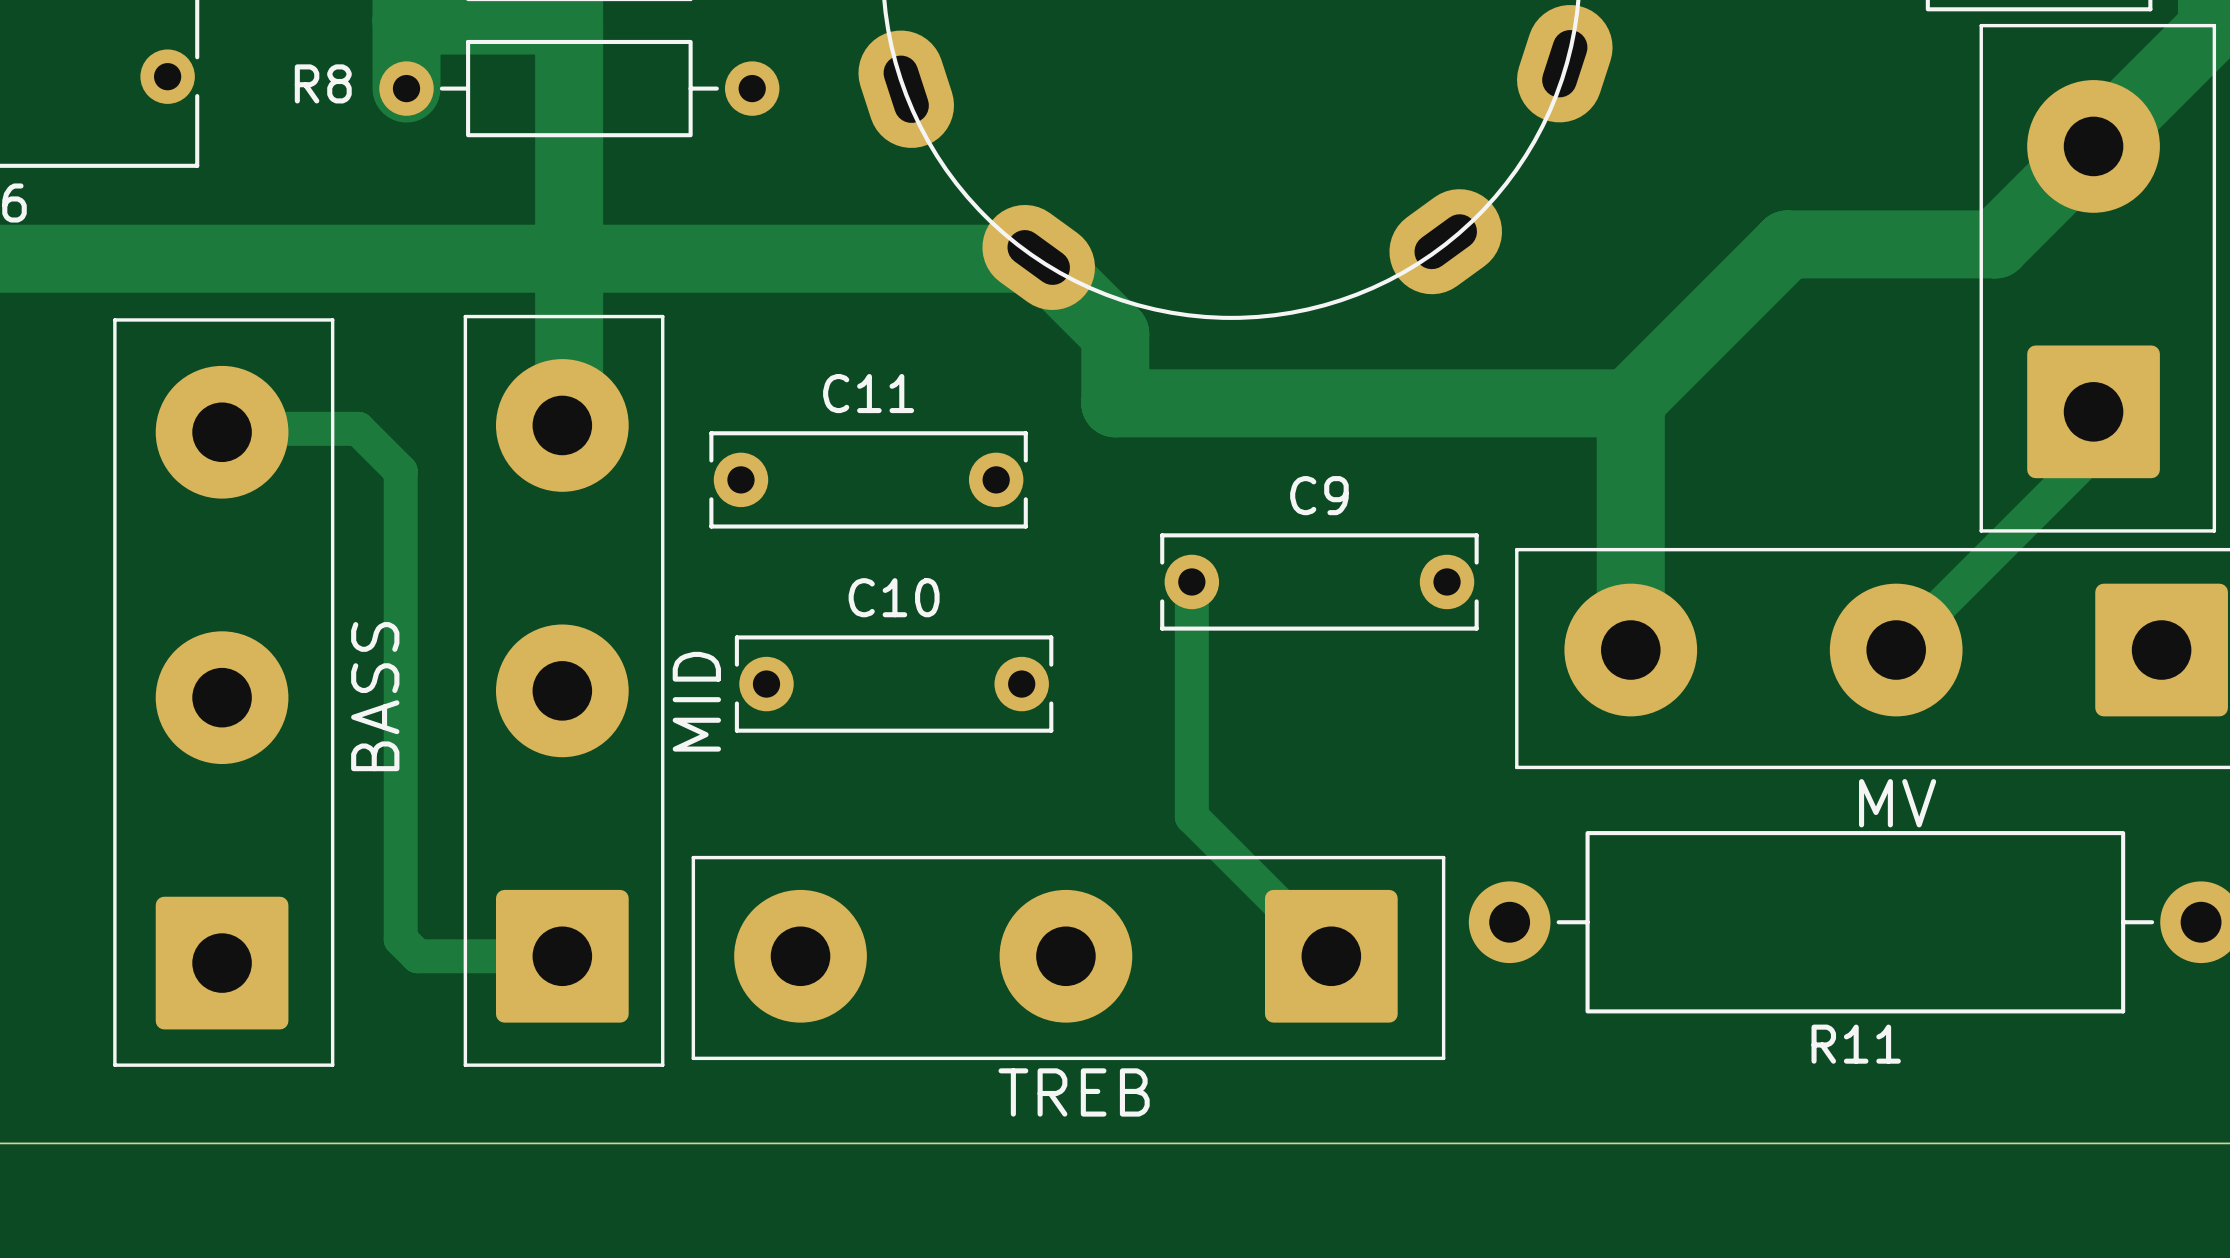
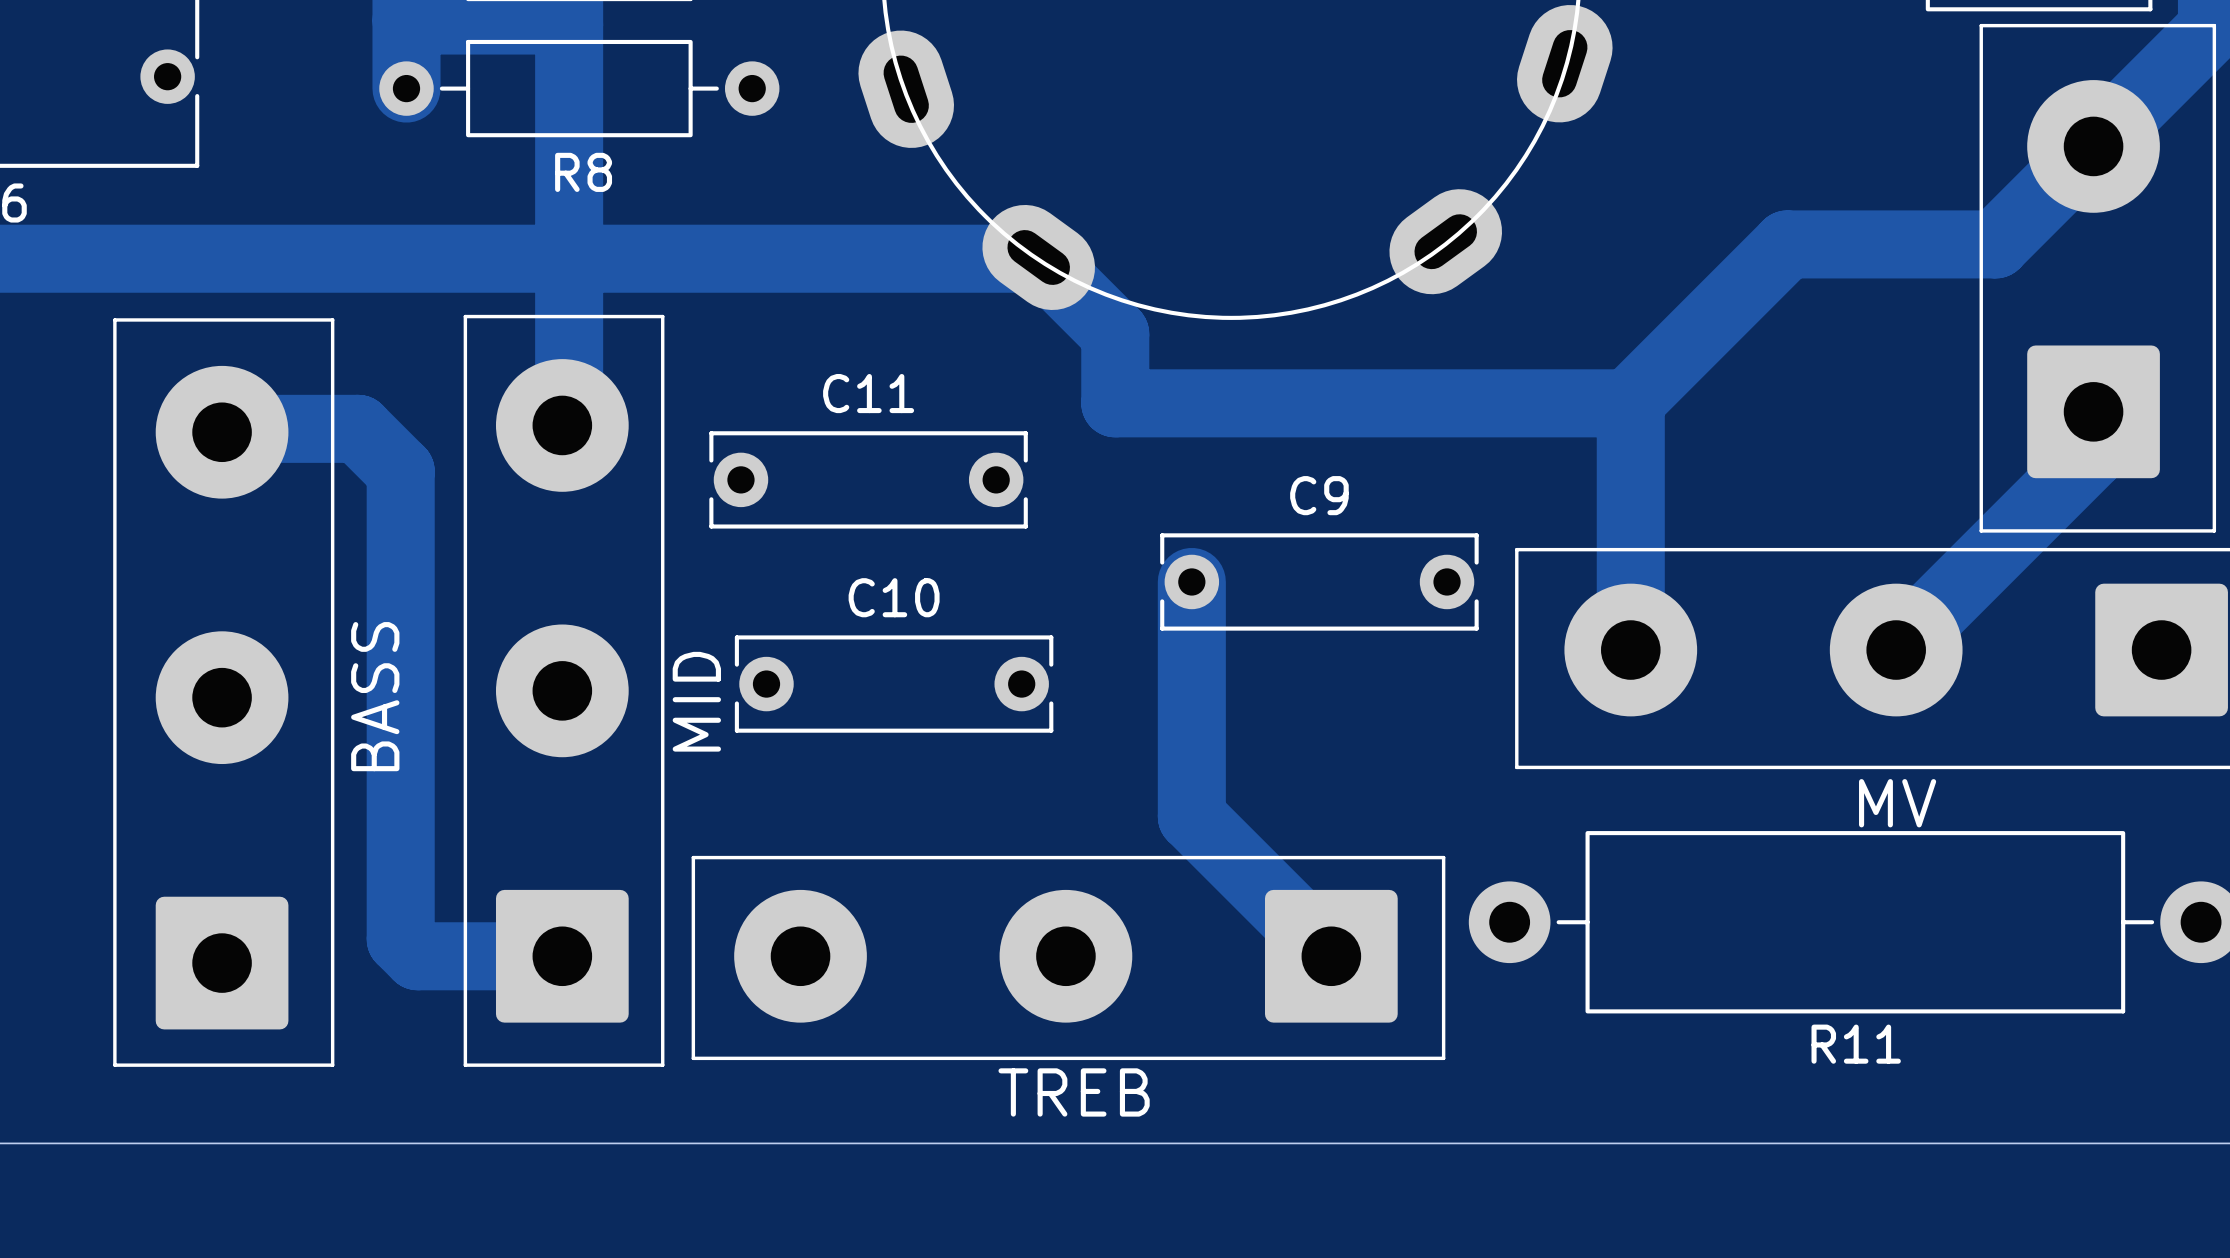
R8 name position: R8 (323, 83) -> R8 (583, 172)
track width: thin (2093, 411) (2093, 452) (1896, 650) -> thick (2093, 411) (2093, 452) (1896, 650)
track width: thin (222, 432) (225, 428) (358, 428) (400, 471) (400, 939) (417, 956) (562, 956) -> thick (222, 432) (225, 428) (358, 428) (400, 471) (400, 939) (417, 956) (562, 956)
track width: thin (1191, 581) (1191, 816) (1331, 956) -> thick (1191, 581) (1191, 816) (1331, 956)

